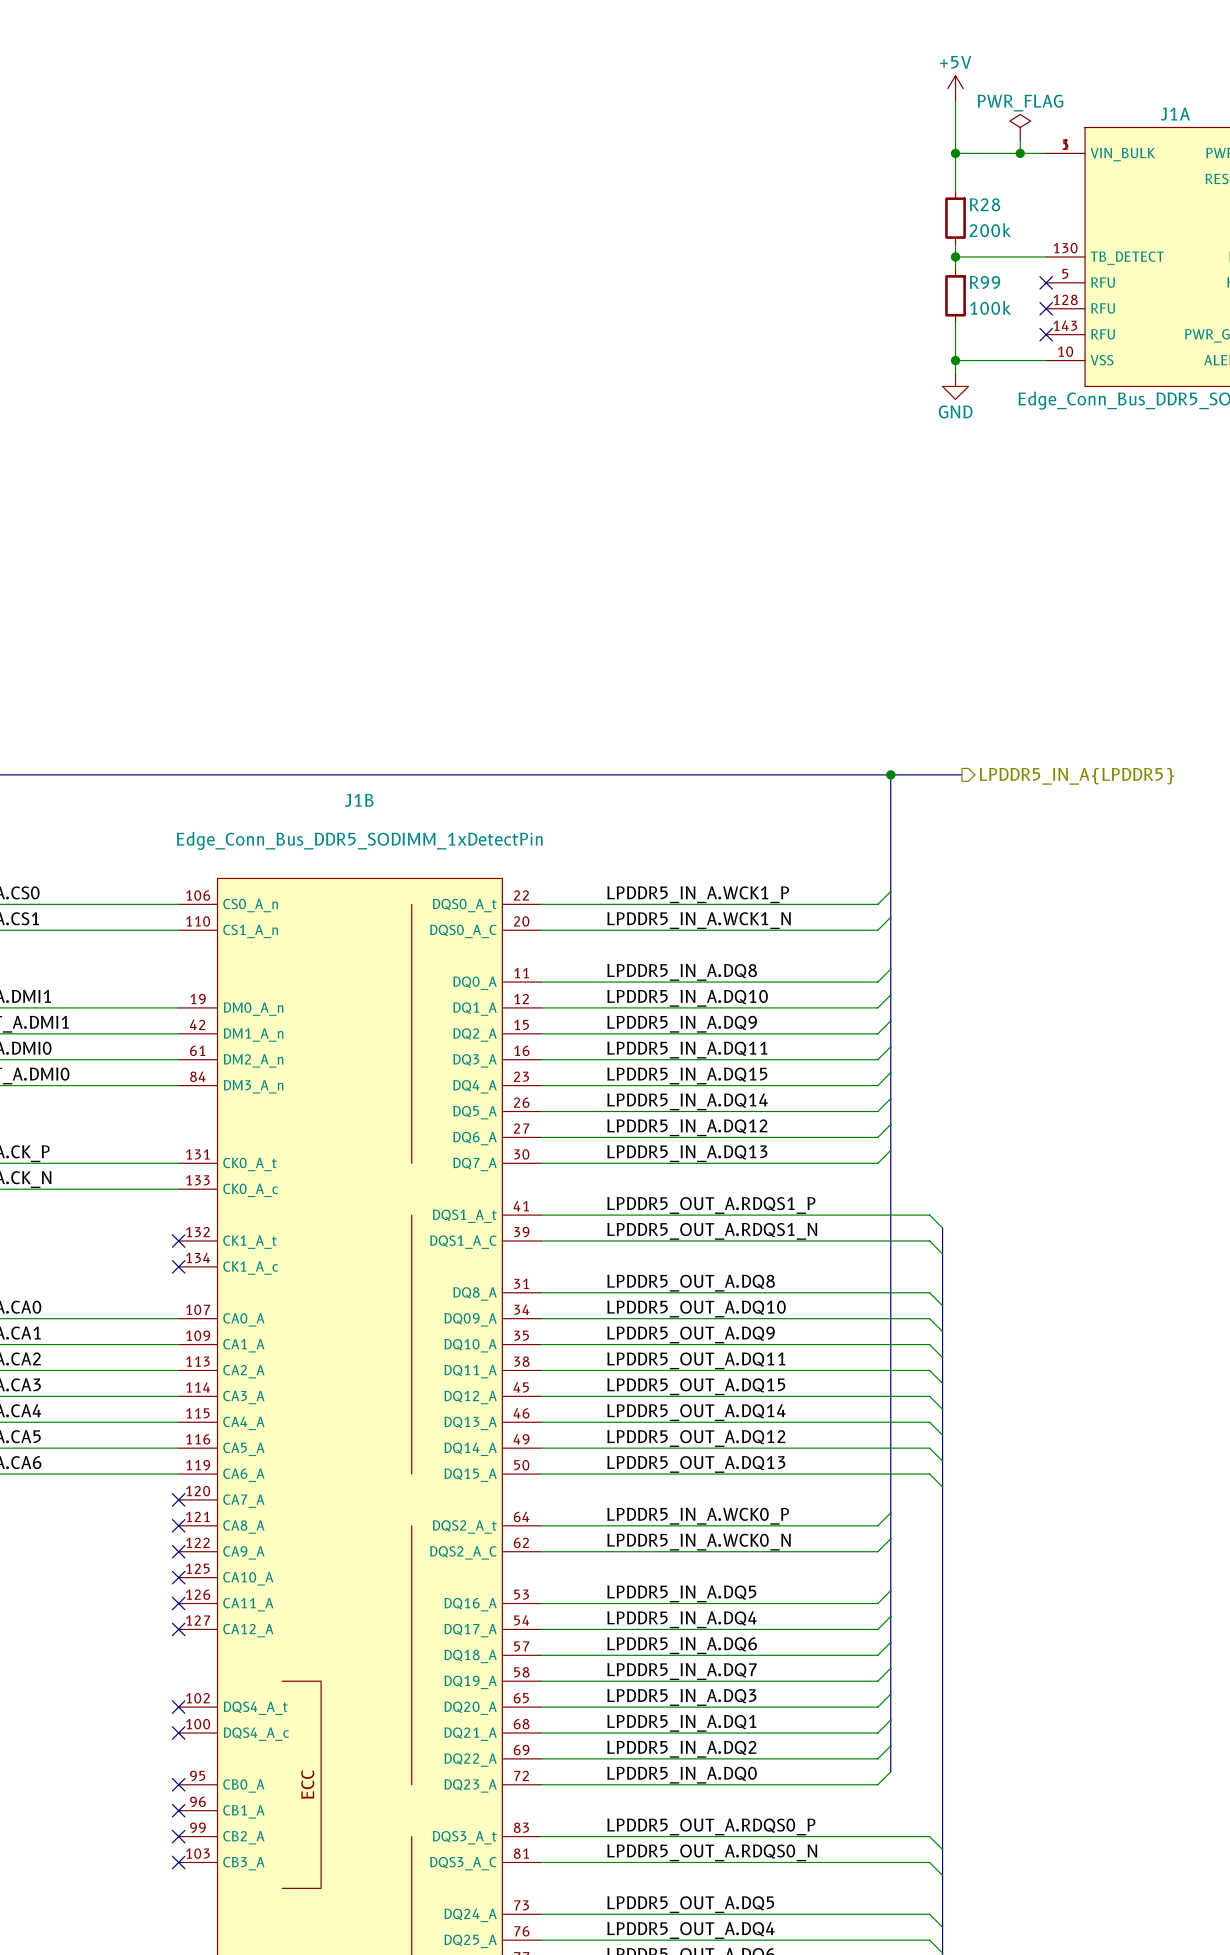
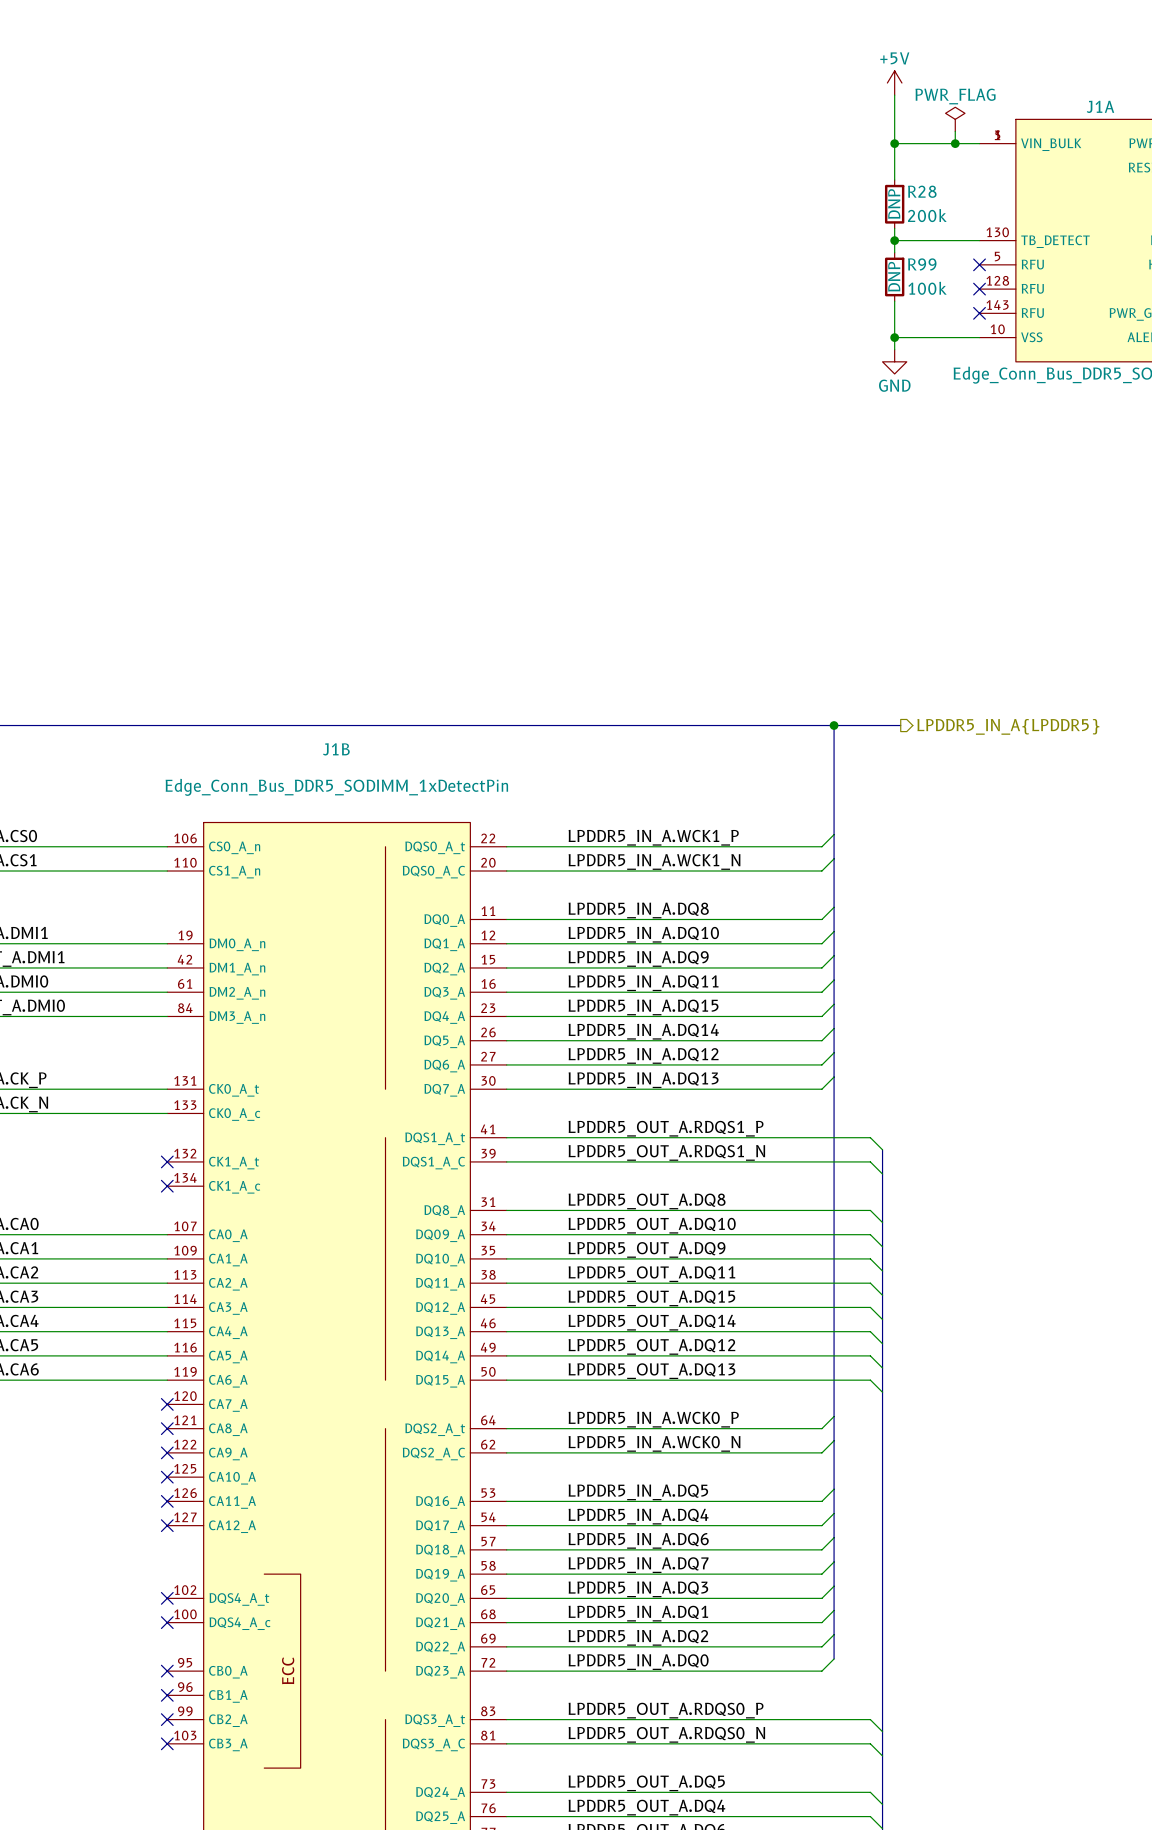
R28 text: none -> DNP (894, 203)
R99 text: none -> DNP (894, 276)

